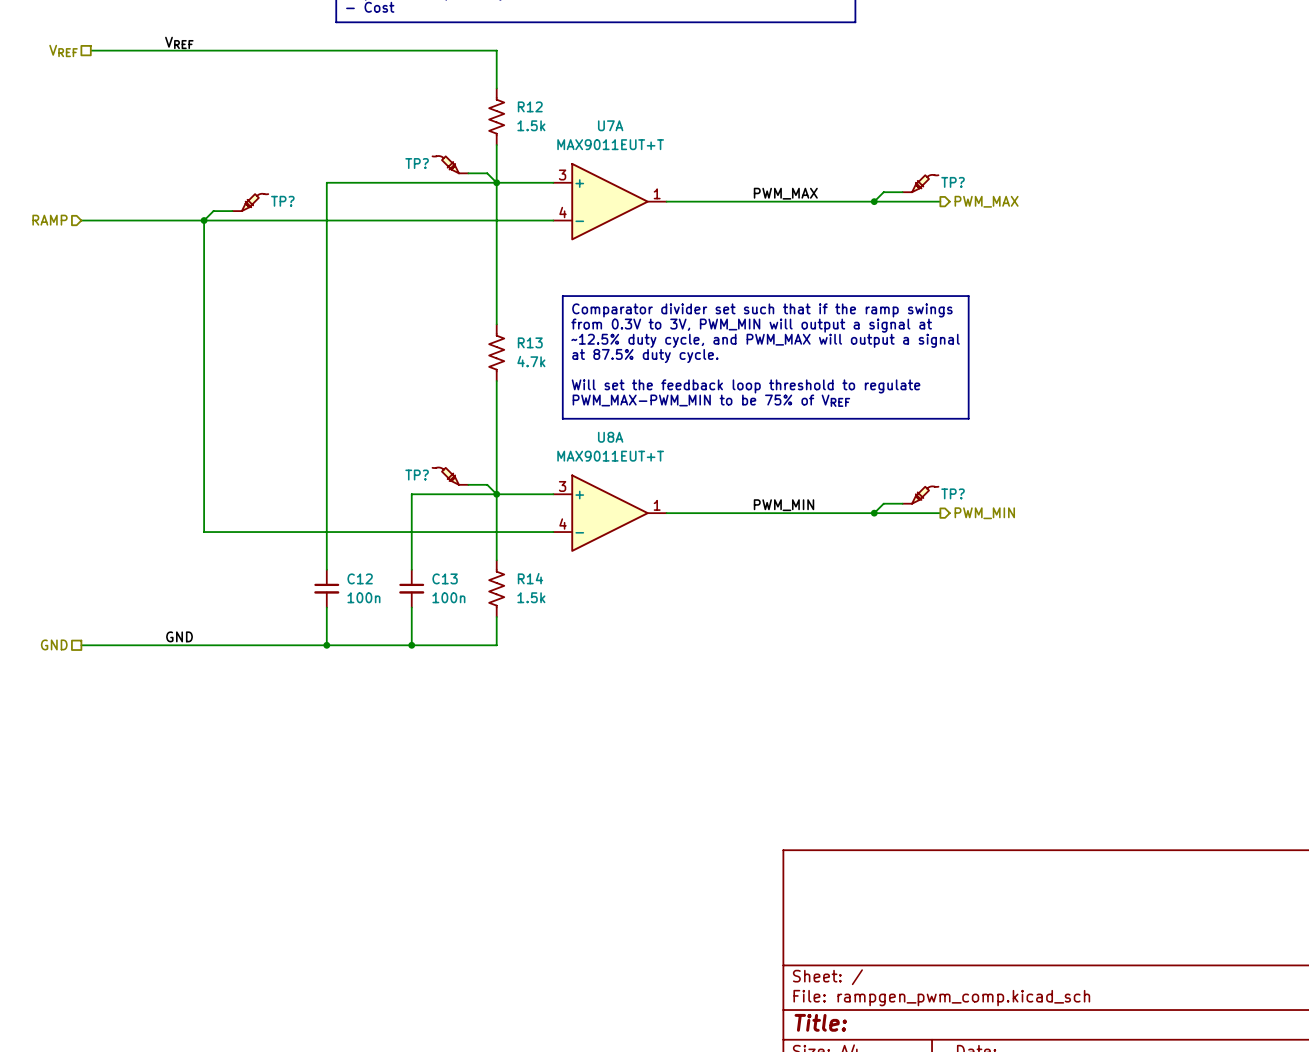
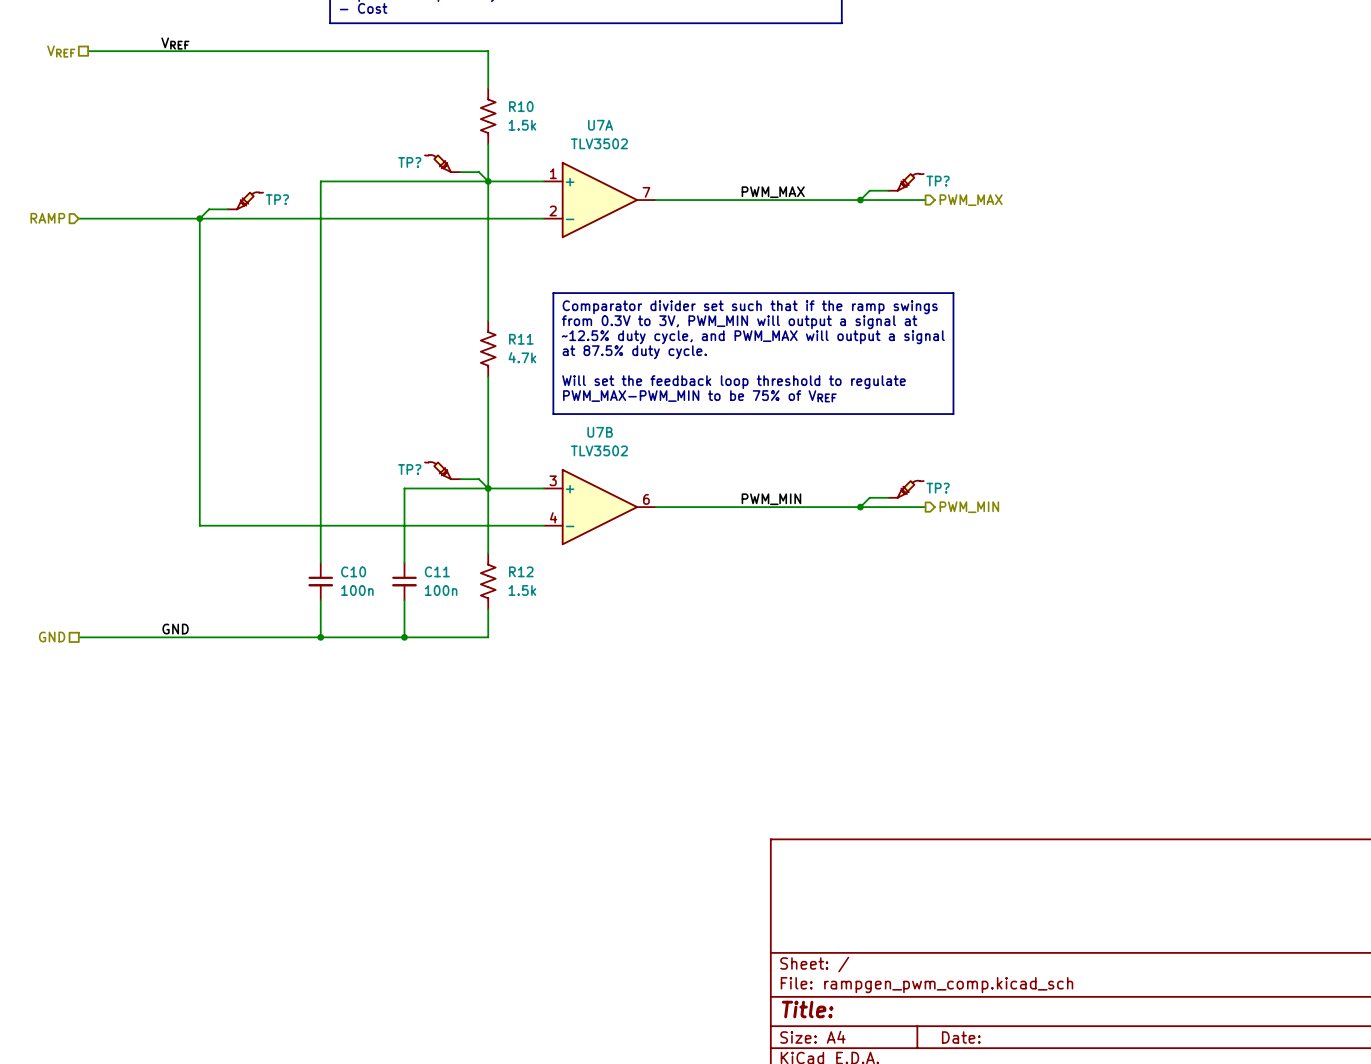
R12 name: R12 (530, 106) -> R10 (521, 106)
U7A value: MAX9011EUT+T (610, 144) -> TLV3502 (599, 143)
U7A pin number: 3 (562, 174) -> 1 (553, 173)
U7A pin number: 1 (657, 193) -> 7 (646, 192)
U7A pin number: 4 (563, 212) -> 2 (553, 210)
R13 name: R13 (530, 342) -> R11 (521, 339)
U8A name: U8A (610, 437) -> U7B (600, 432)
U8A value: MAX9011EUT+T (610, 456) -> TLV3502 (599, 450)
U8A pin number: 1 (657, 505) -> 6 (646, 499)
C12 name: C12 (360, 578) -> C10 (353, 571)
C13 name: C13 (445, 578) -> C11 (437, 571)
R14 name: R14 (530, 578) -> R12 (521, 571)

